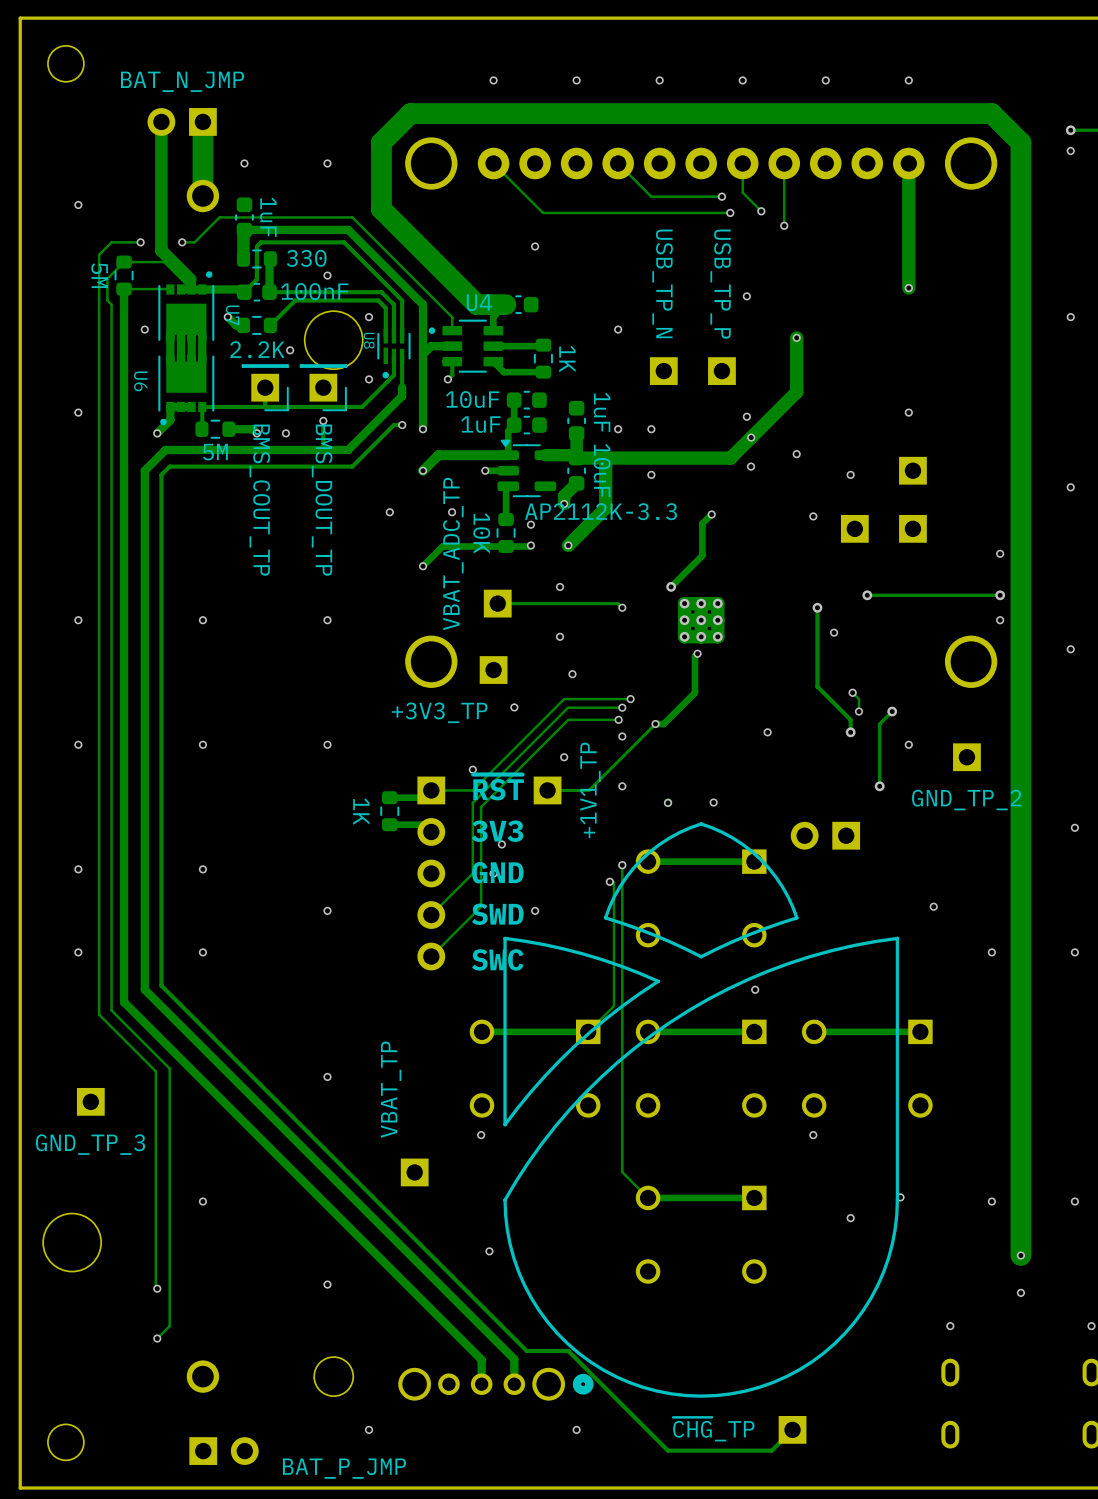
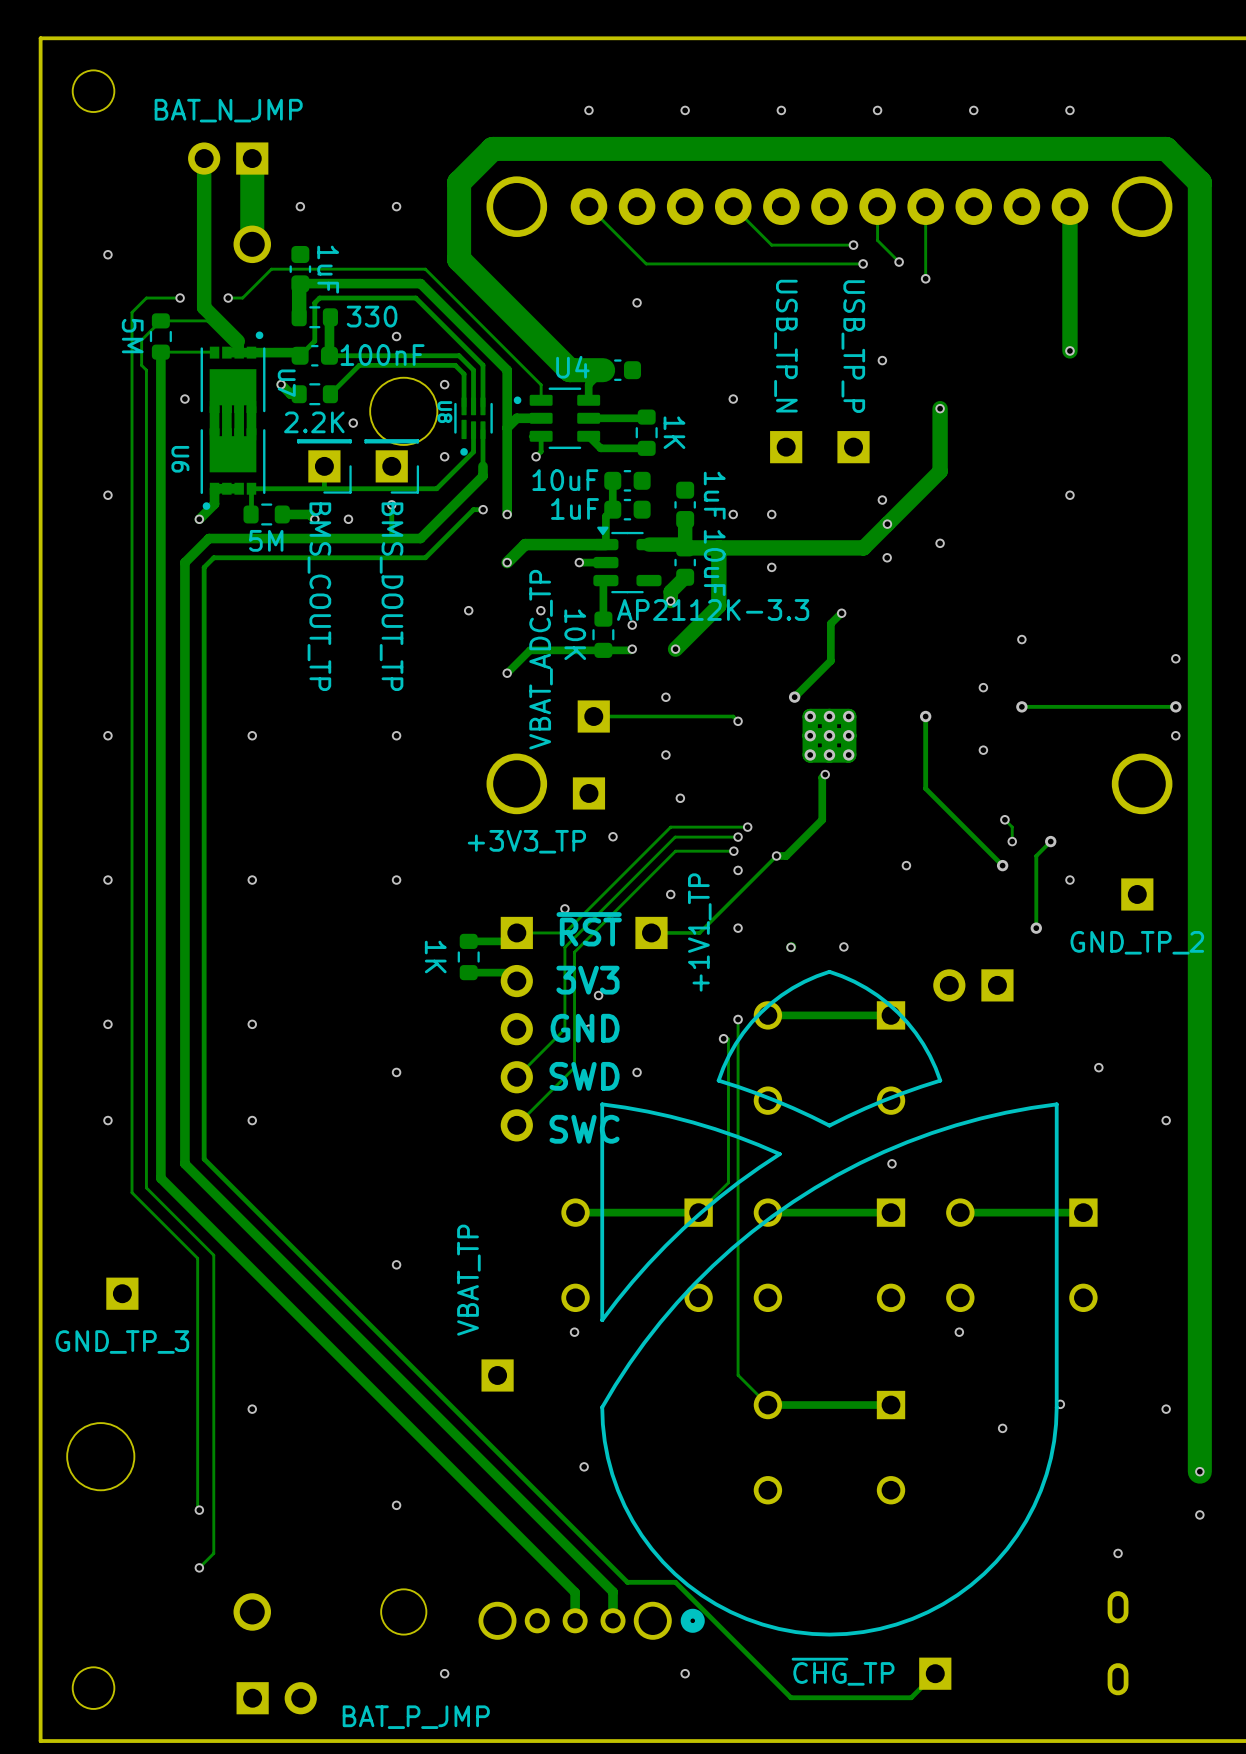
part: (912, 470) -> none
via: (850, 474) -> none
via: (813, 516) -> none
part: (854, 528) -> none
part: (912, 528) -> none
via: none -> (1021, 639)
via: none -> (983, 687)
track: (817, 607) (817, 686) (850, 719) (850, 732) -> (925, 716) (925, 788) (1002, 865)
via position: (817, 607) -> (925, 716)

